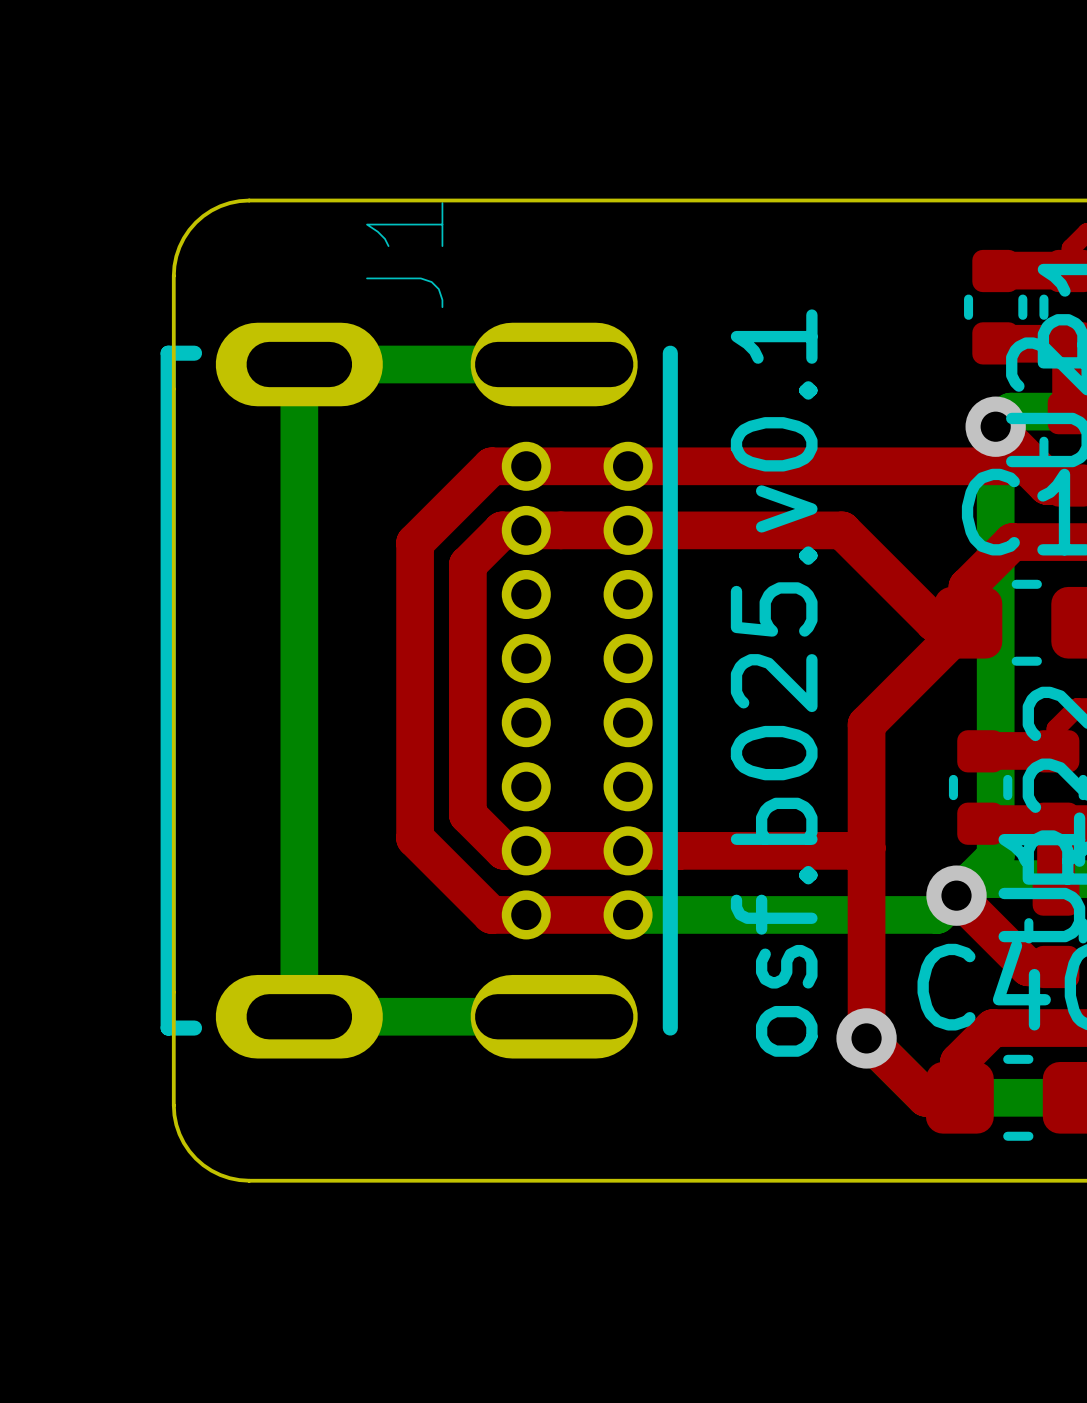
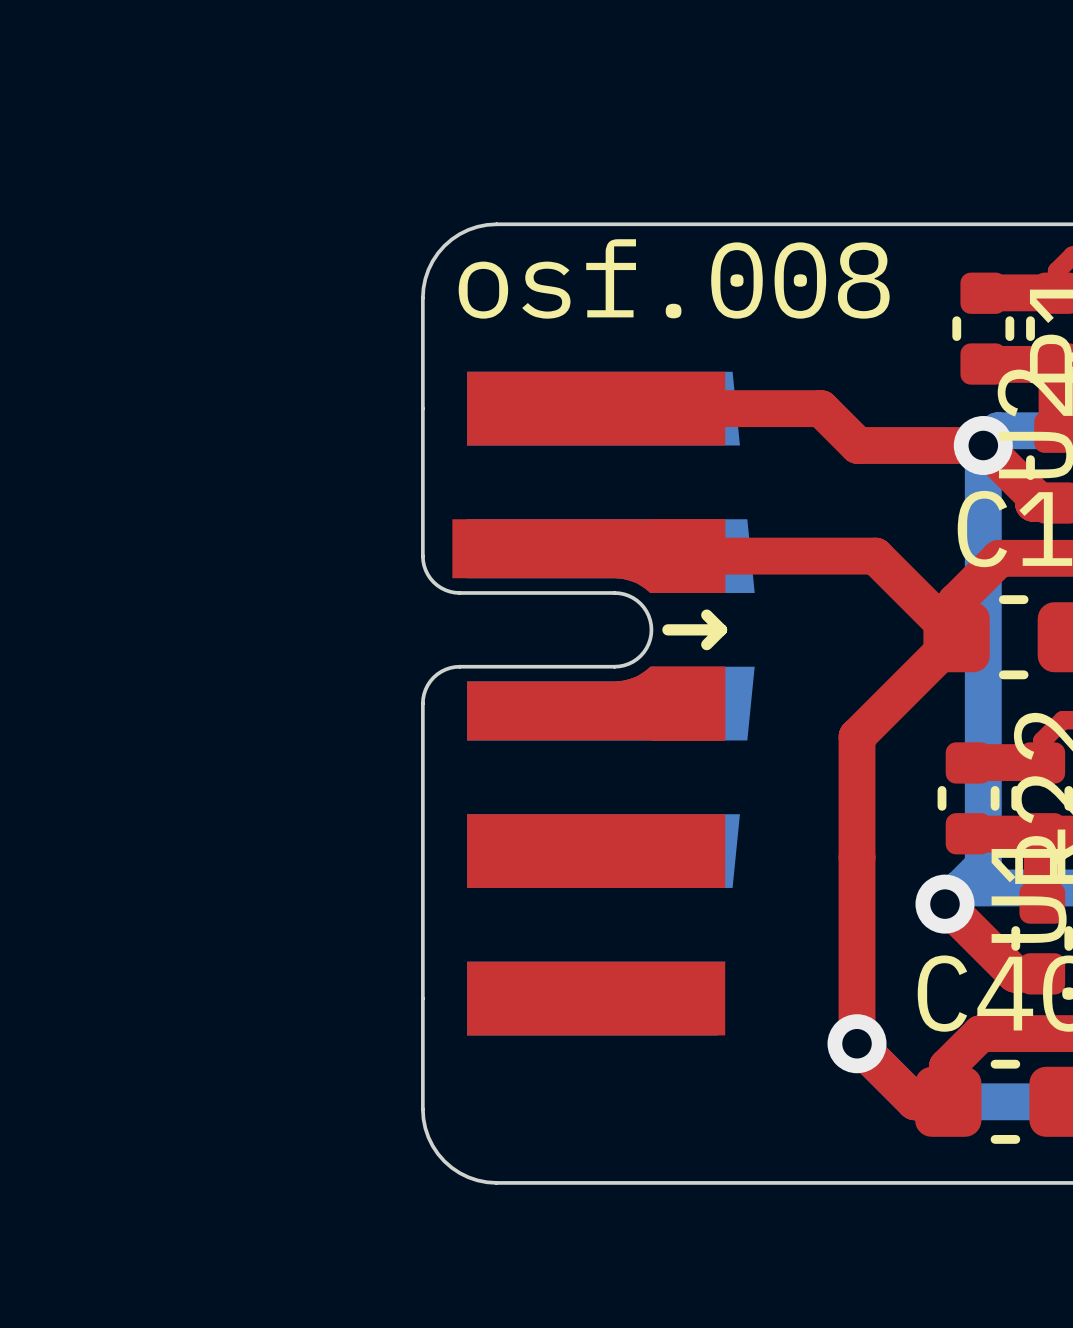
board edge: (498, 200) (249, 200) (229, 203) (203, 216) (189, 230) (176, 256) (173, 275) (173, 1105) (179, 1134) (189, 1151) (203, 1165) (220, 1175) (239, 1180) (498, 1180) -> (496, 224) (468, 229) (451, 239) (438, 253) (428, 269) (422, 298) (422, 408)
text: none -> osf.008 (674, 278)
bottom track: (554, 364) (299, 364) (299, 1016) (554, 1016) -> none
top track: none -> (596, 408) (821, 408) (857, 445) (983, 445)
top track: (1046, 485) (1027, 466) (491, 466) (415, 542) (415, 838) (491, 914) (628, 914) -> none
top track: (967, 622) (934, 622) (842, 530) (502, 530) (467, 564) (467, 814) (503, 850) (863, 850) (866, 848) -> (956, 637) (875, 556) (688, 556)
text: osf.b025.v0.1 (774, 683) -> none
J1: (419, 690) -> none
part: none -> (587, 703)
bottom track: (956, 895) (937, 914) (628, 914) -> none
board edge: none -> (422, 998) (422, 1109) (428, 1137) (438, 1154) (451, 1167) (468, 1177) (496, 1182)

